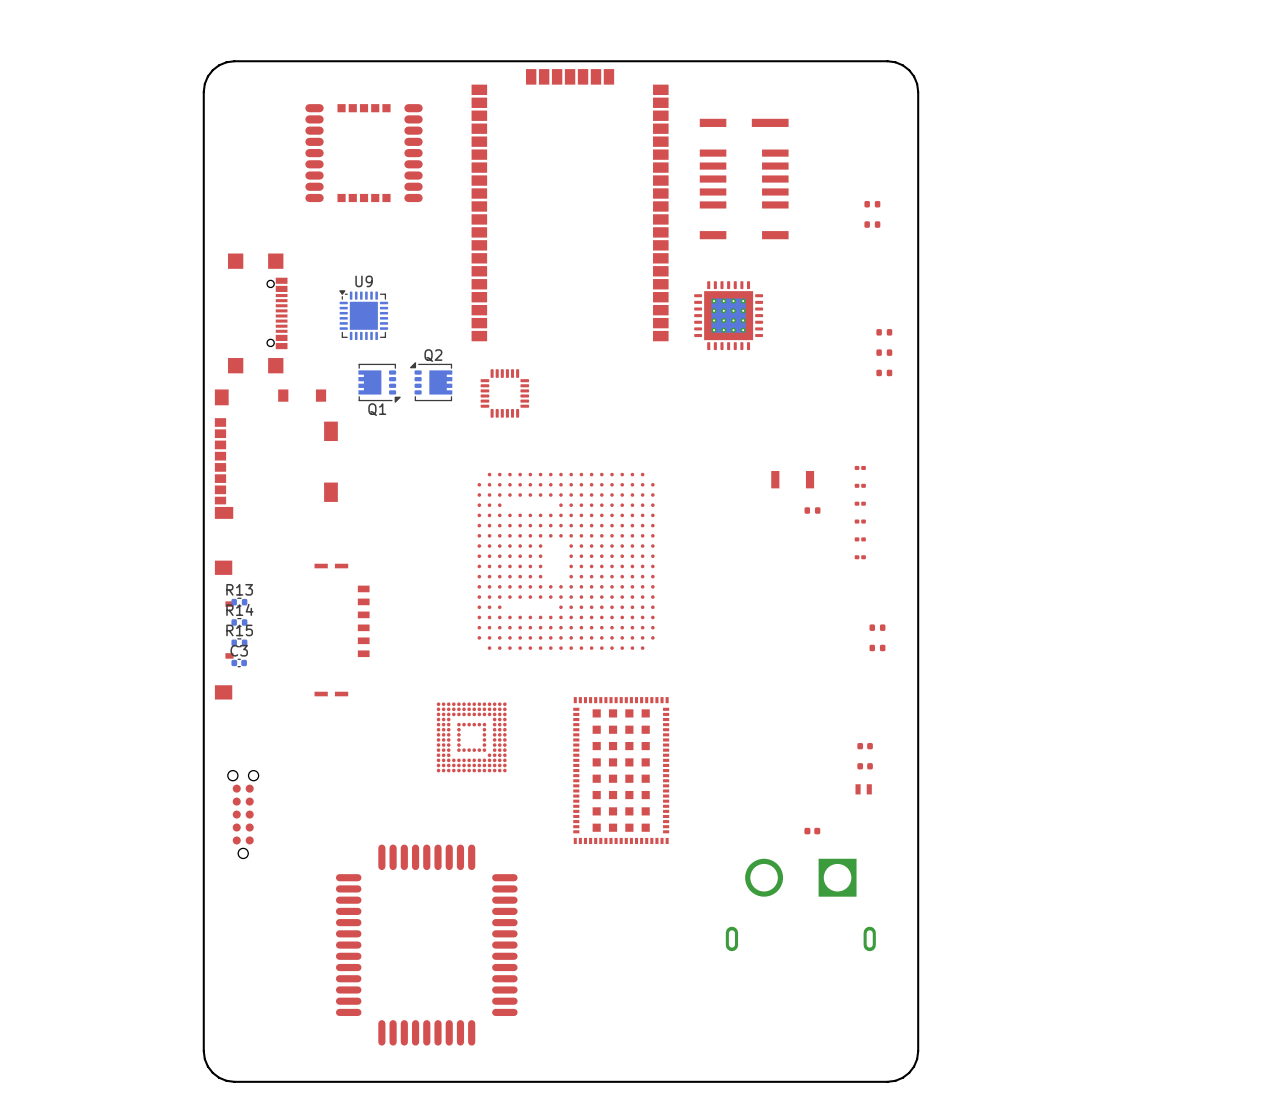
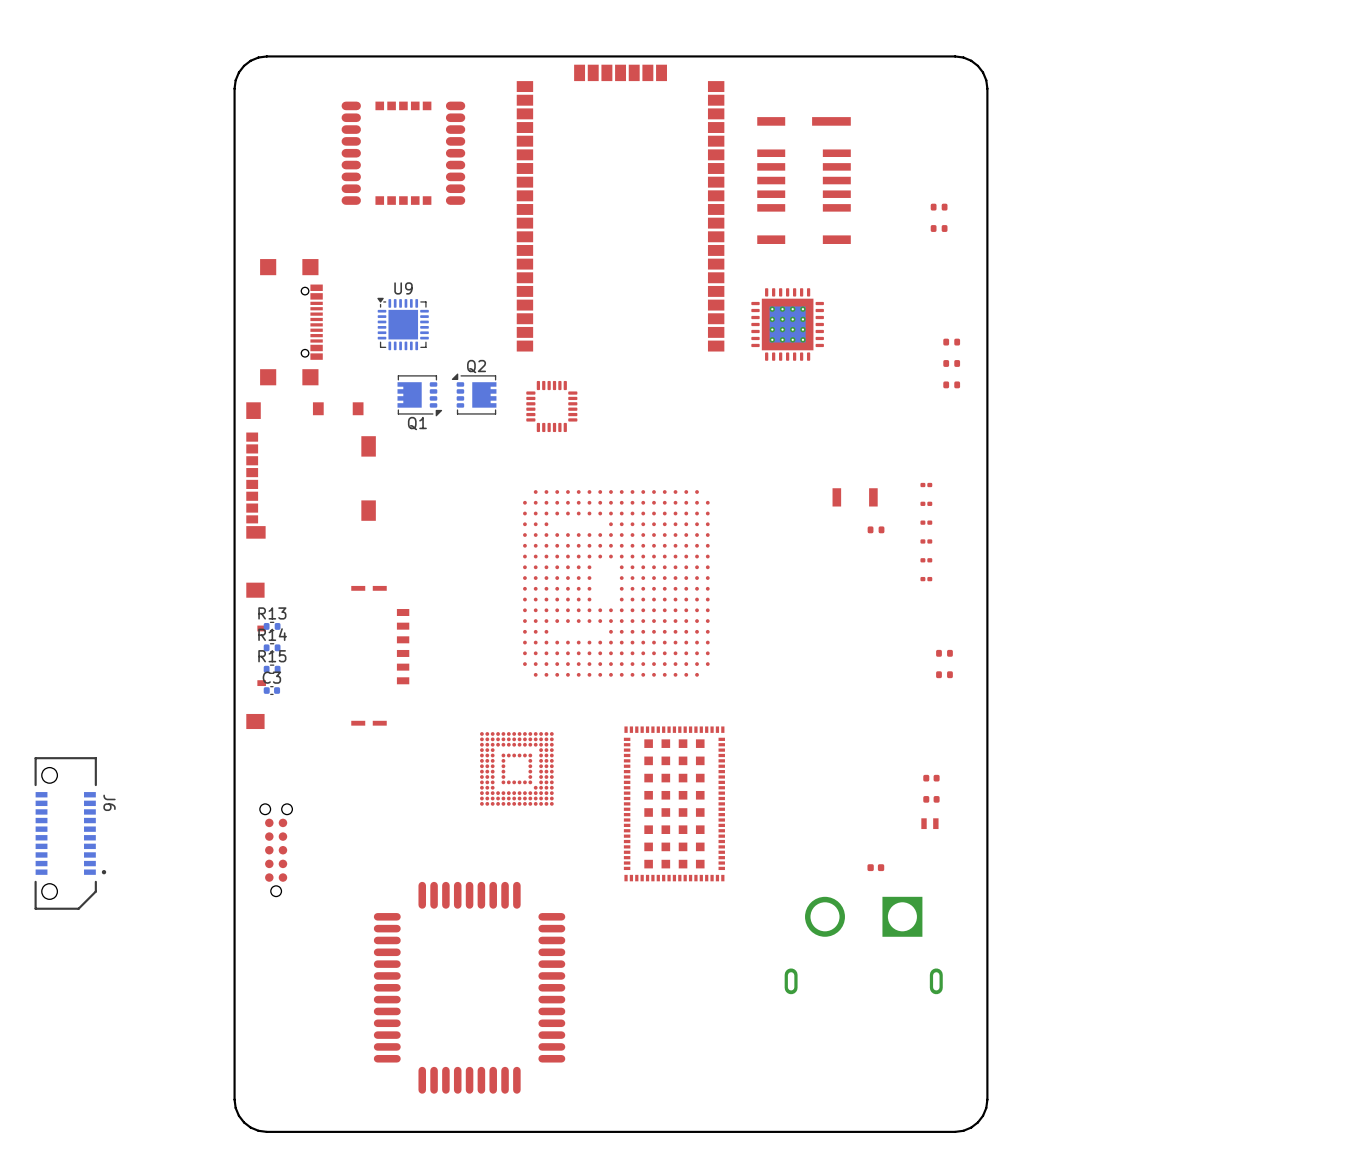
J6: none -> (70, 833)

